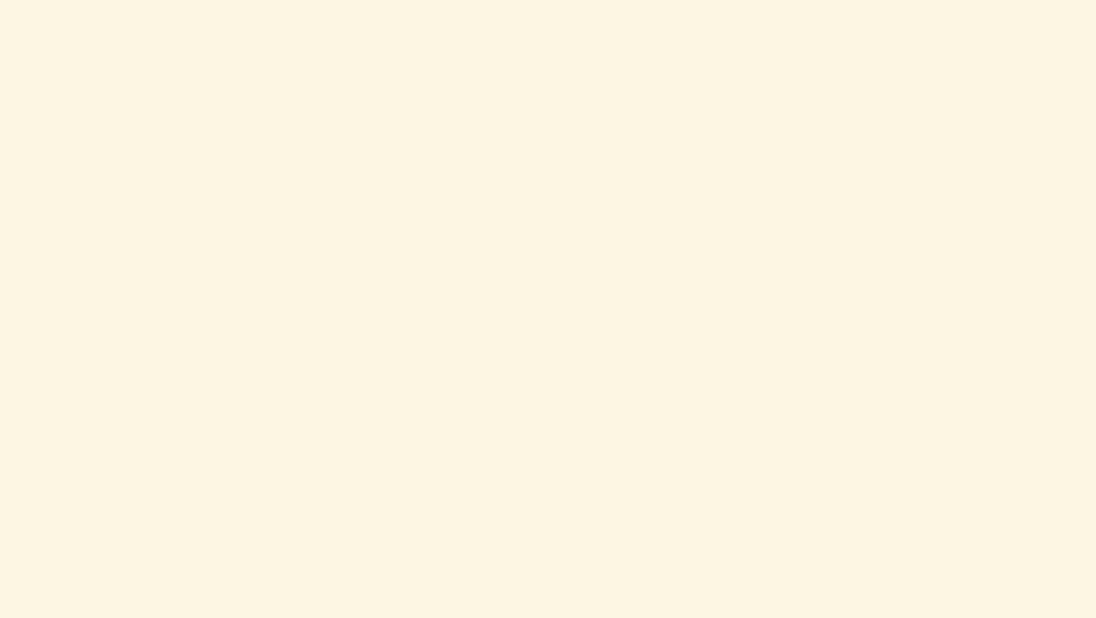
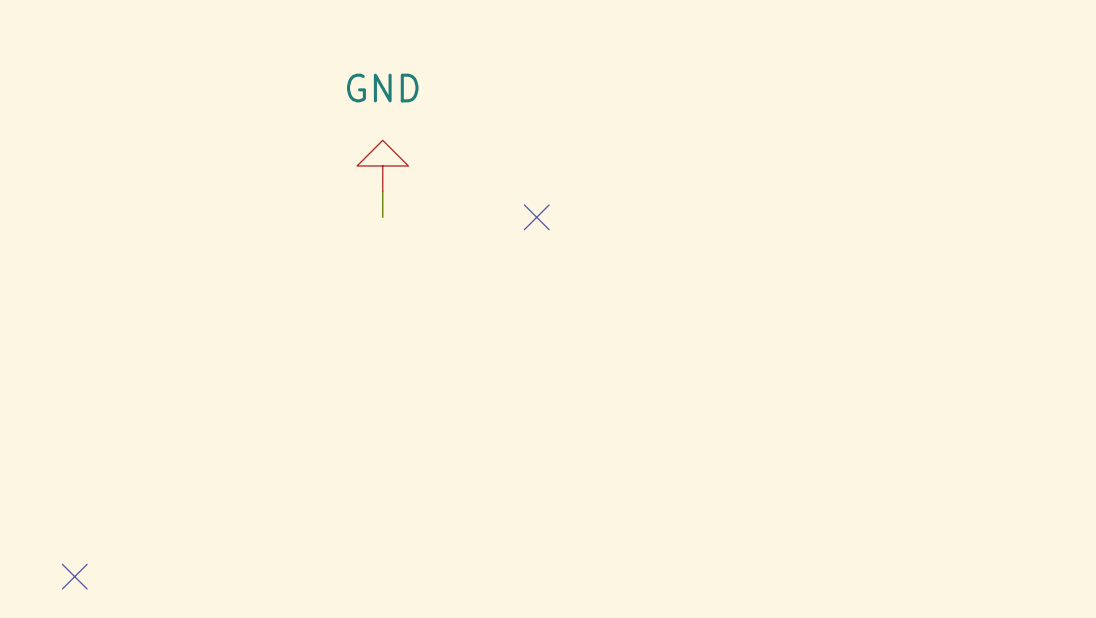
power symbol: none -> GND (382, 165)
wire: none -> (382, 191) (382, 217)
no-connect mark: none -> (536, 217)
no-connect mark: none -> (74, 576)

